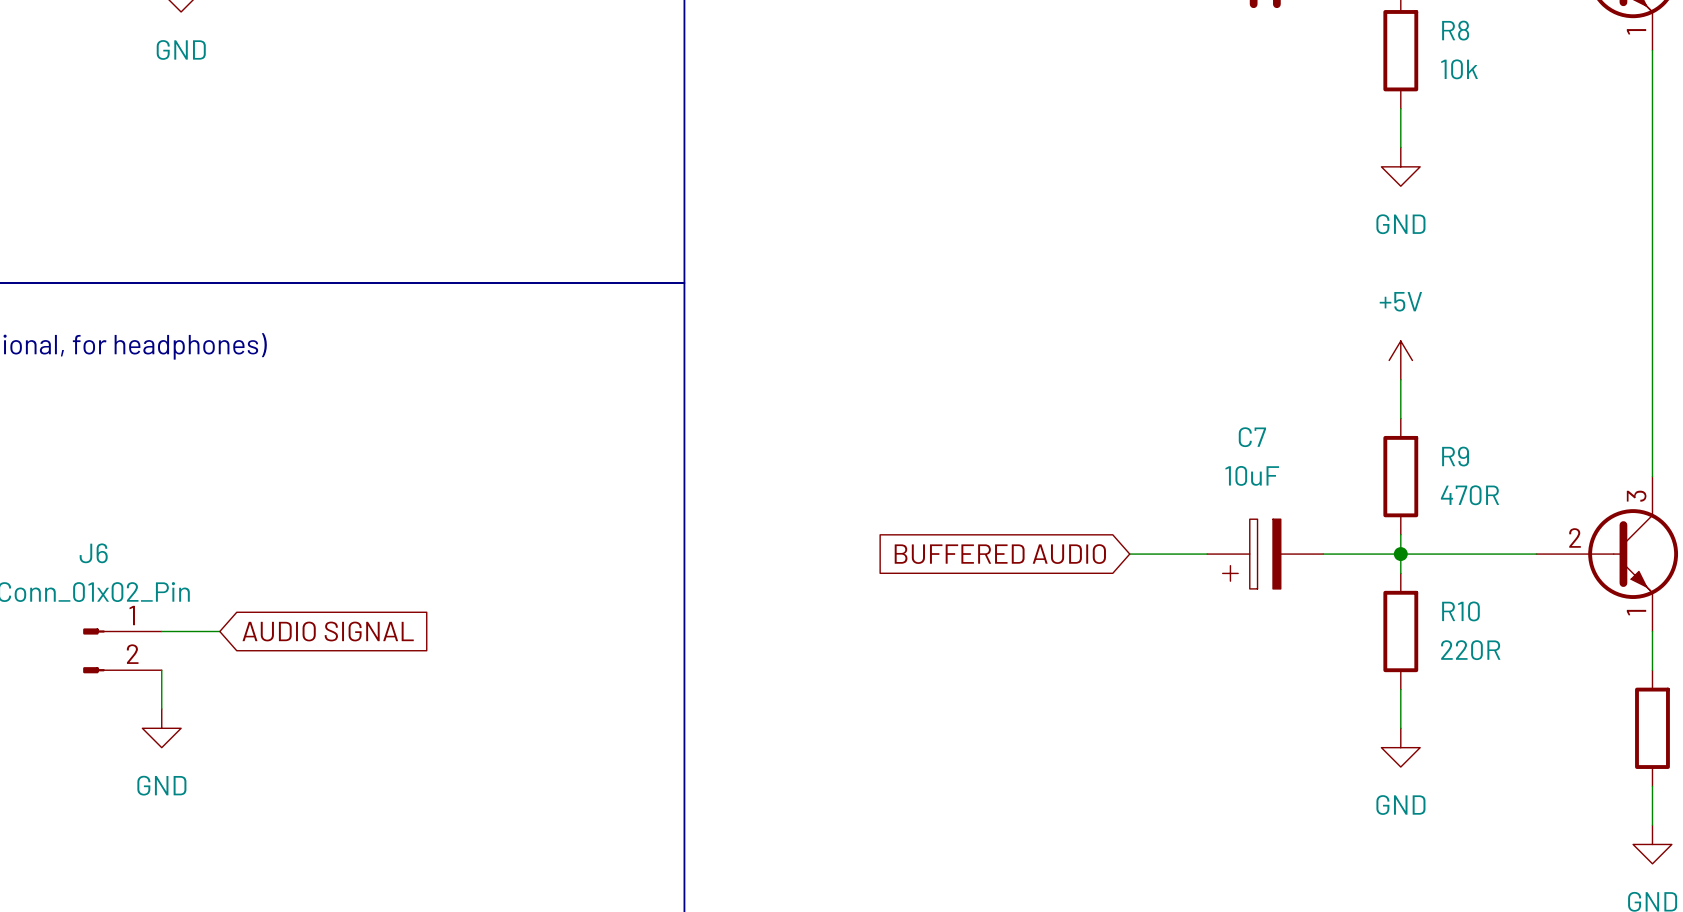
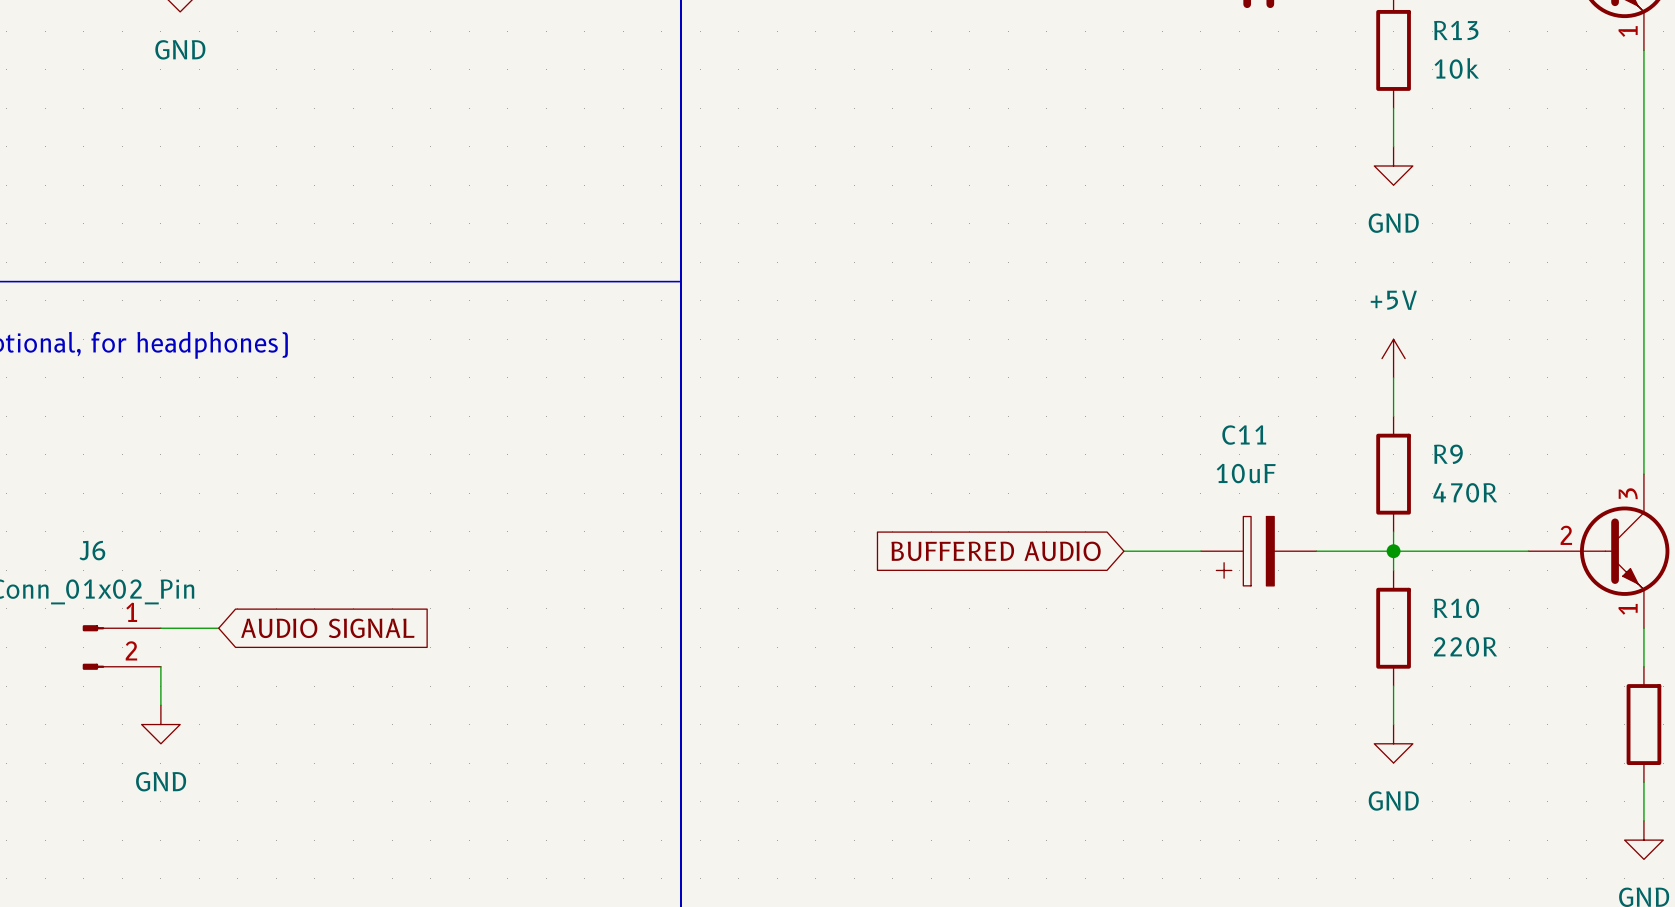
R8 name: R8 (1455, 30) -> R13 (1456, 30)
C7 name: C7 (1252, 437) -> C11 (1244, 435)

